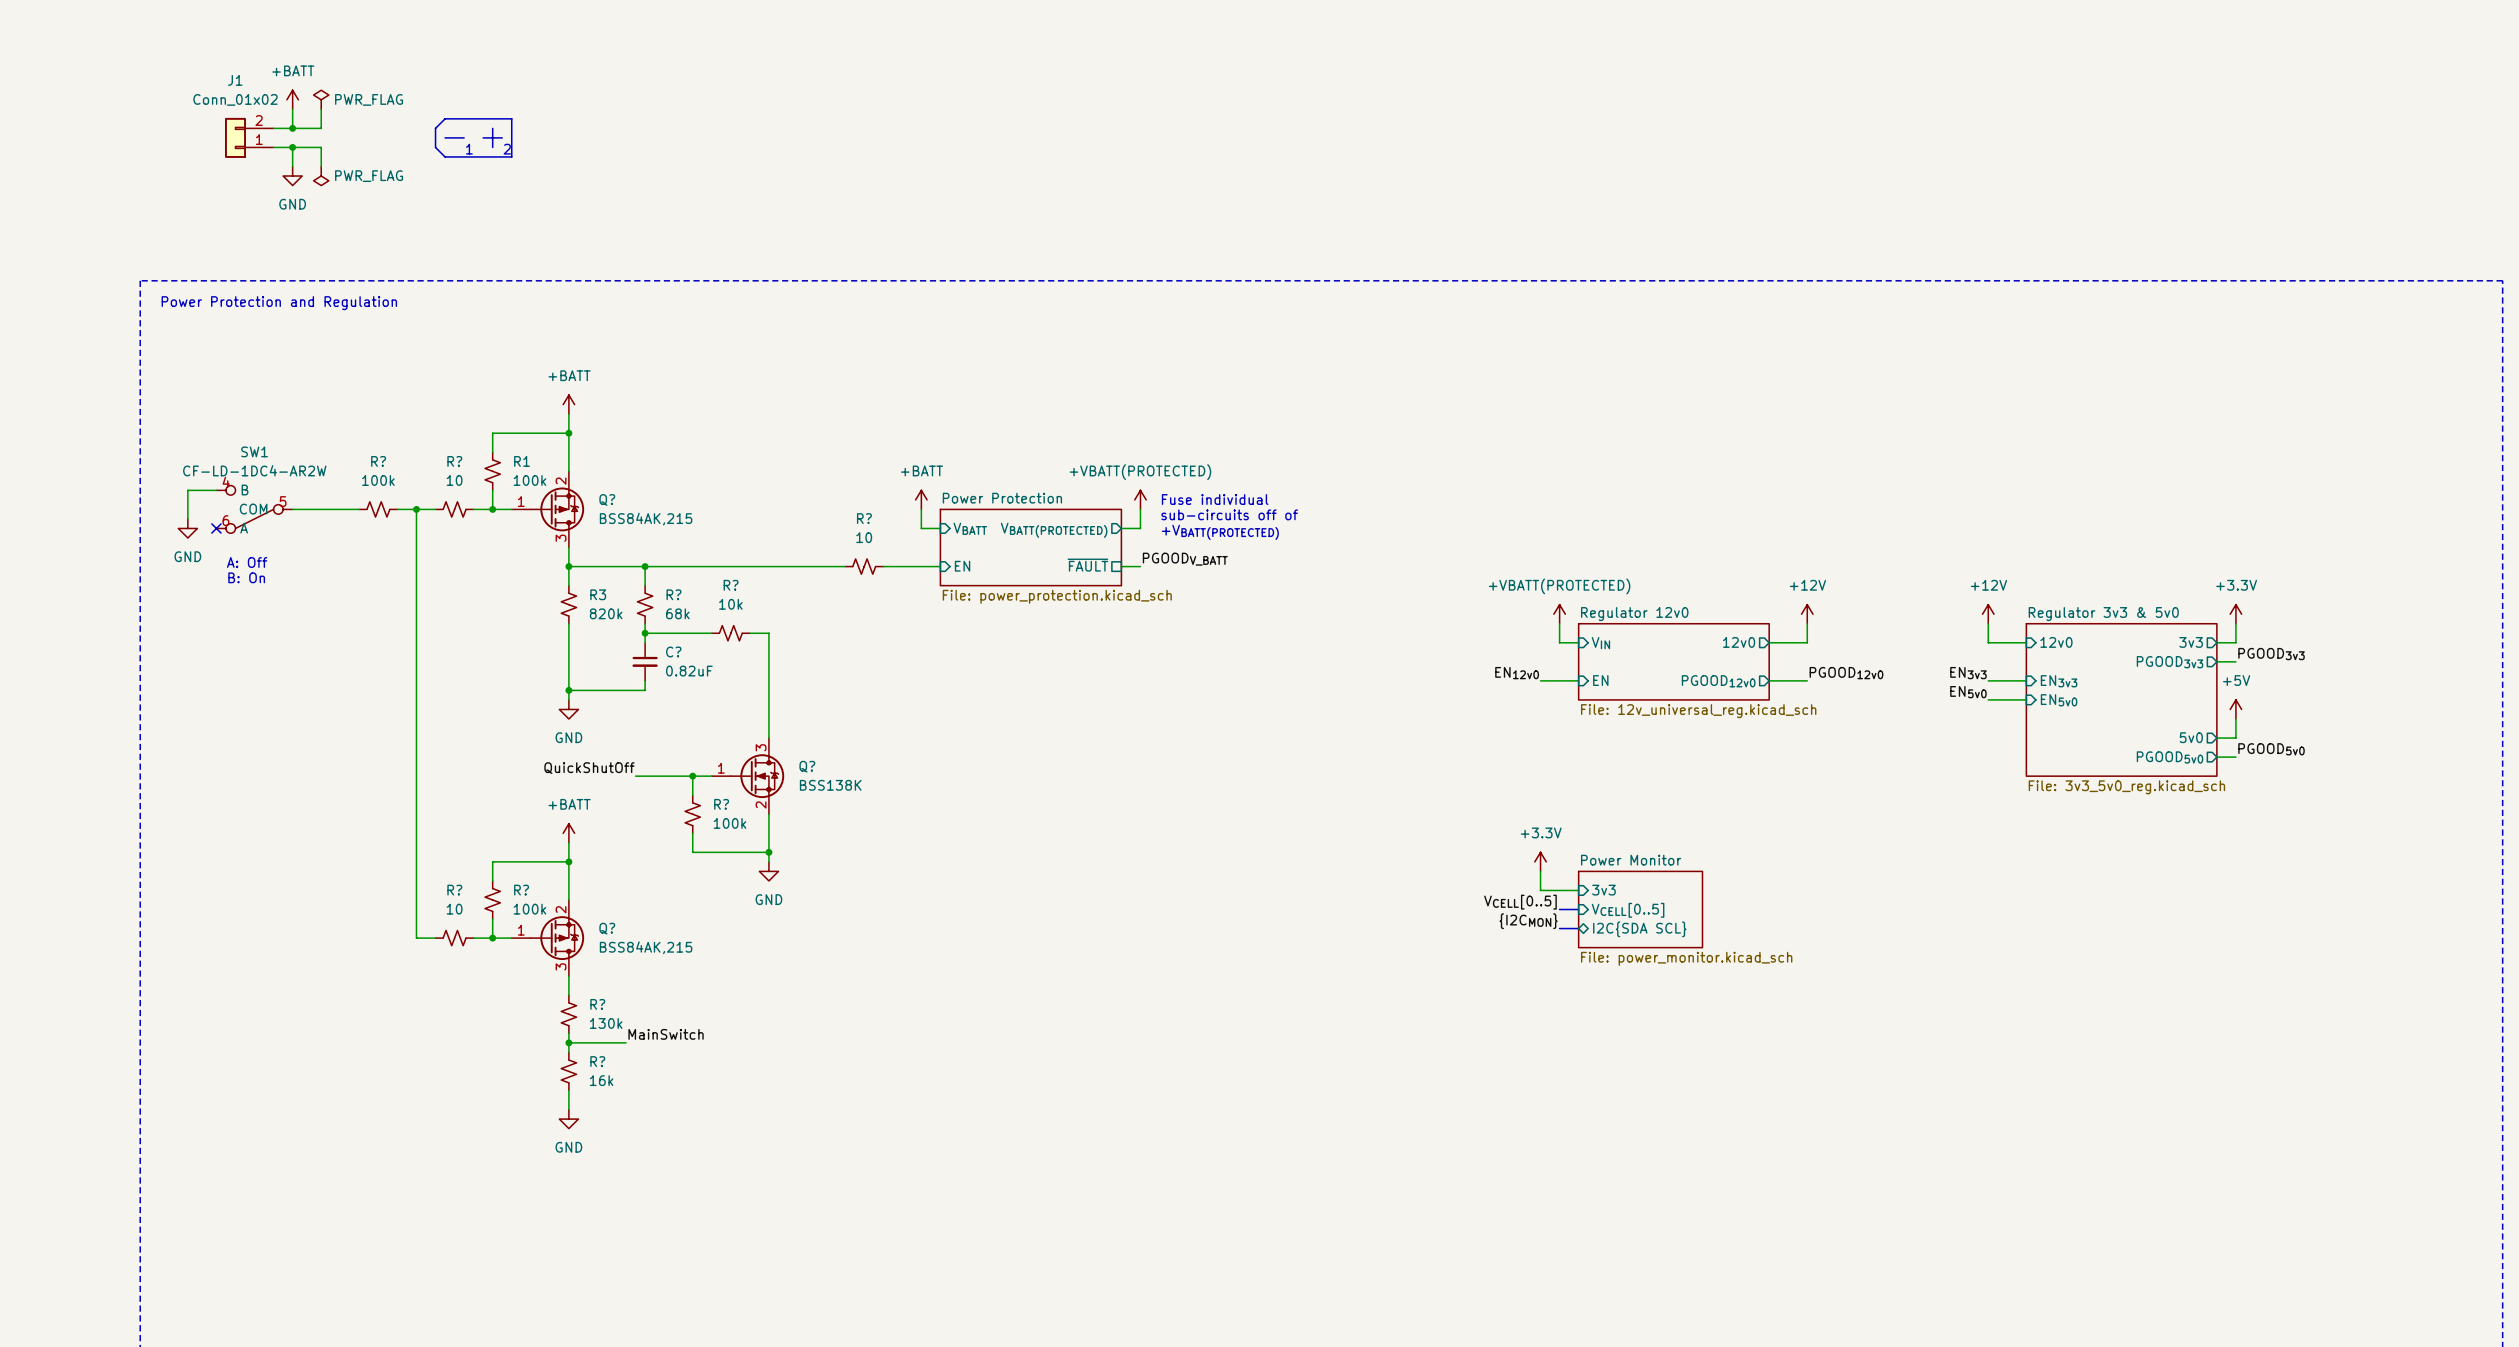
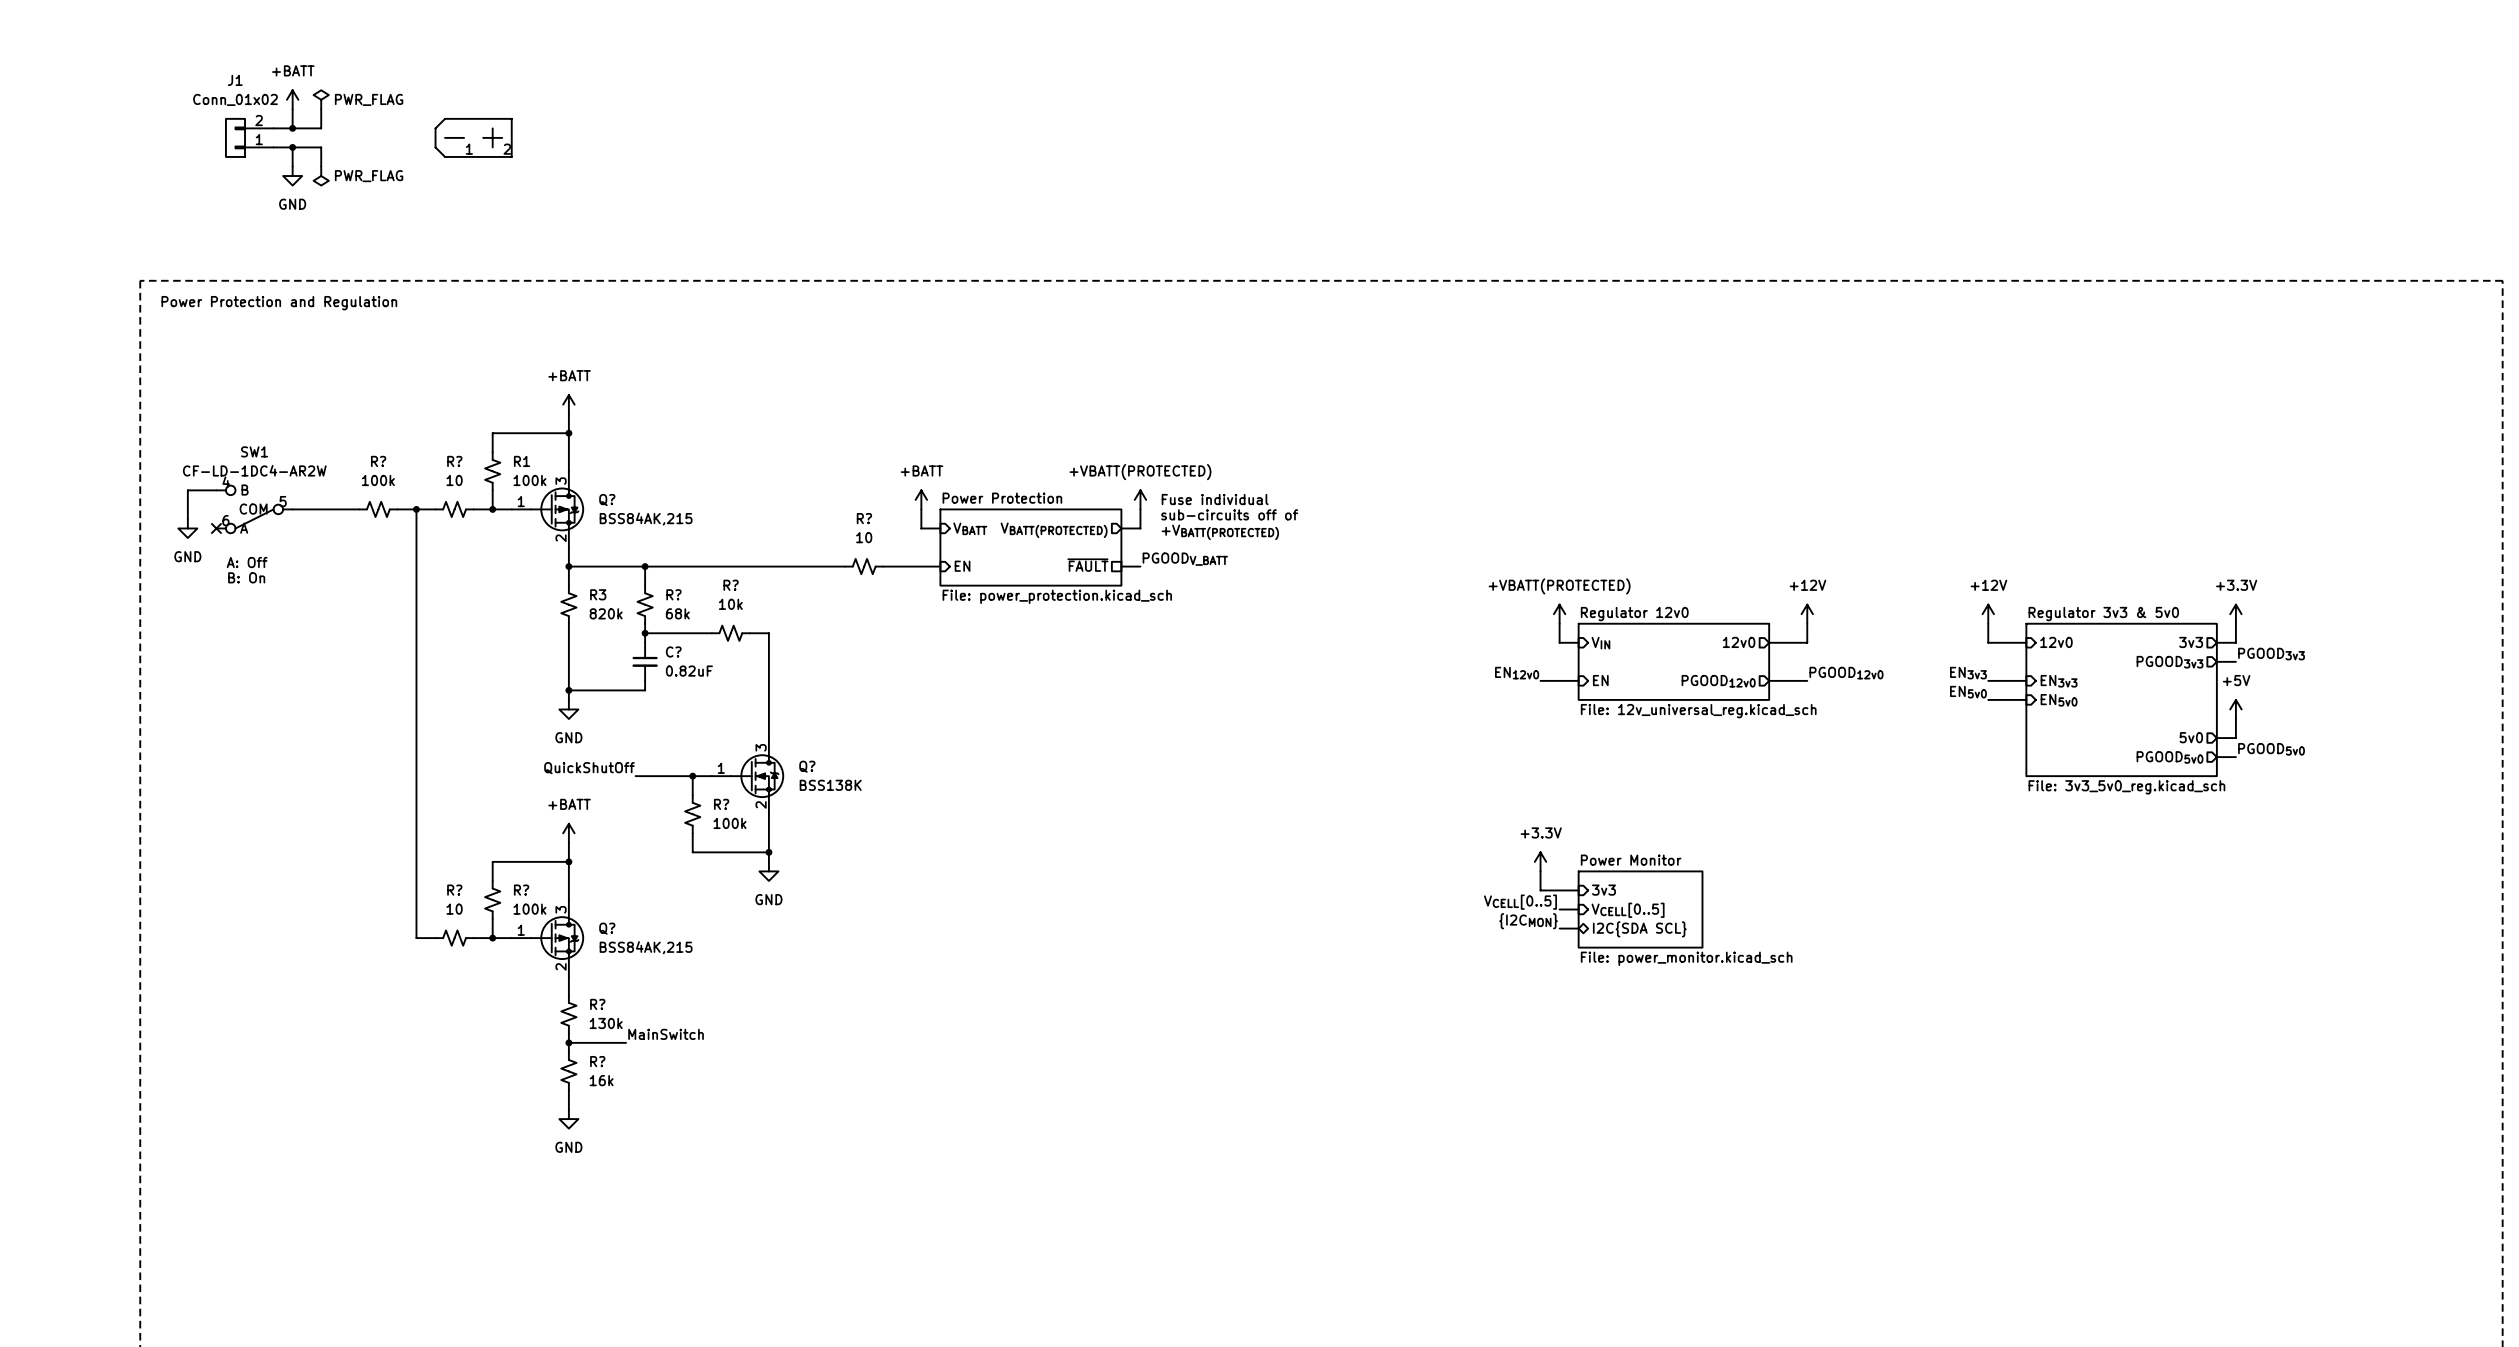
Q? flip: as is (557, 509) -> up-down (557, 509)
Q? flip: as is (557, 938) -> up-down (557, 938)

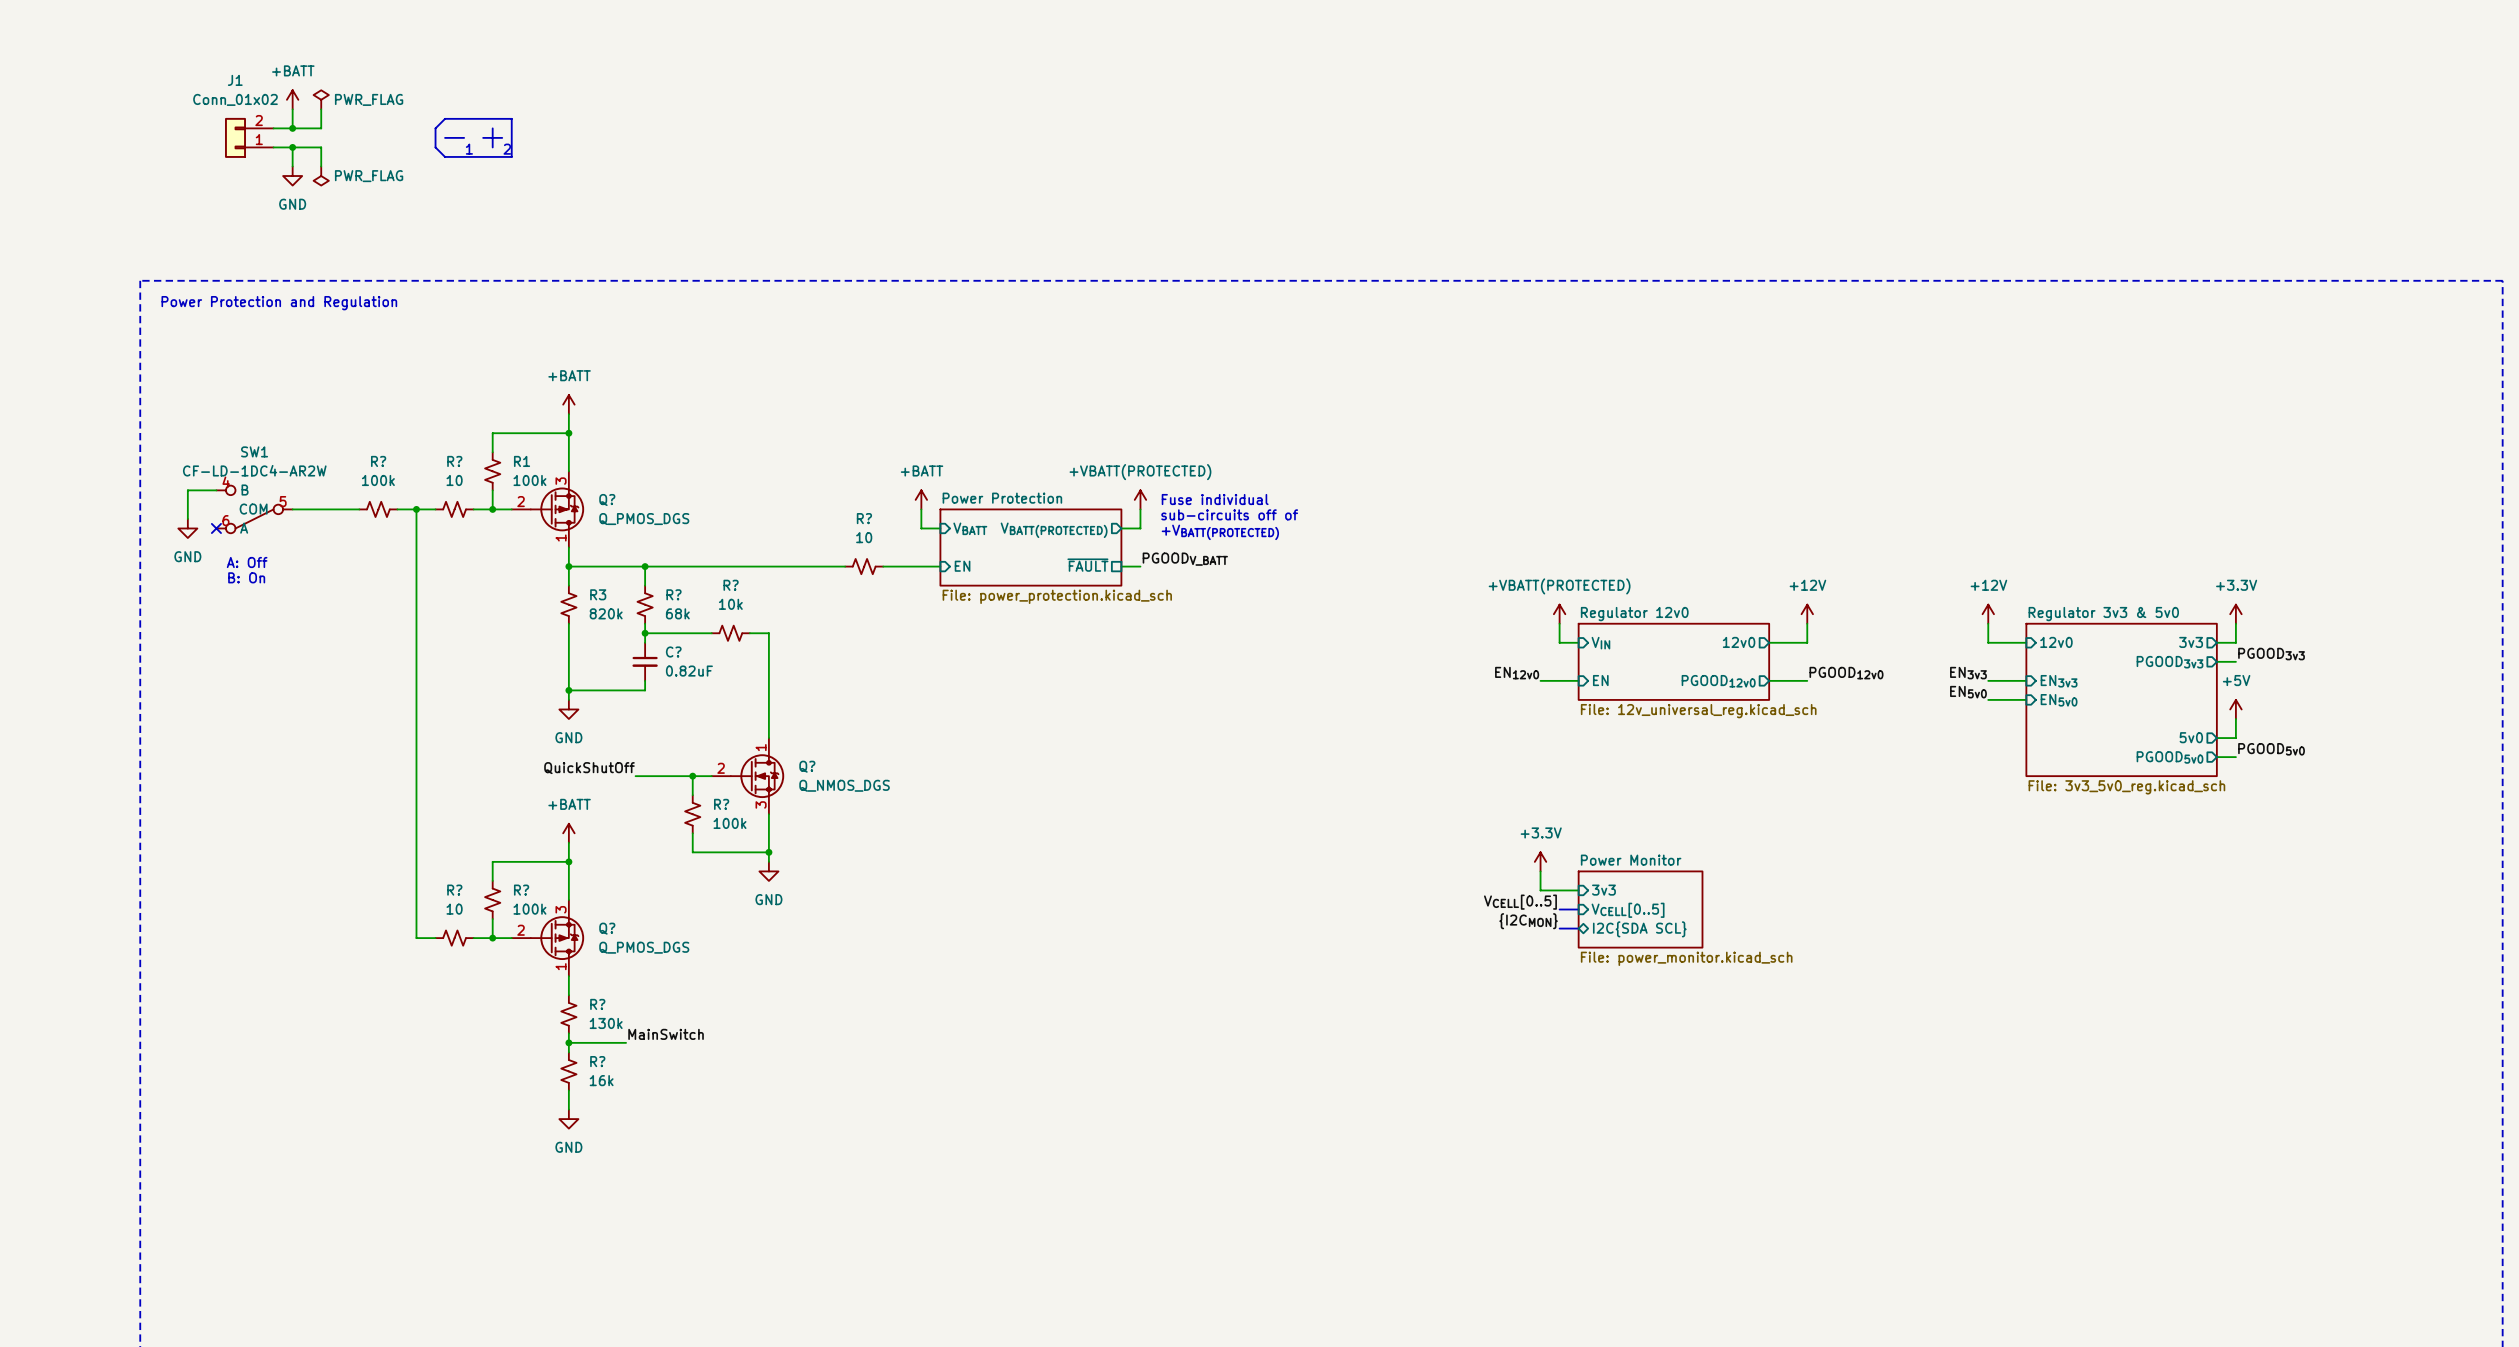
Q? symbol: [511, 471, 585, 548] -> [511, 471, 585, 548]
Q? value: BSS84AK,215 (646, 519) -> Q_PMOS_DGS (644, 519)
Q? pin number: 3 (761, 747) -> 1 (761, 747)
Q? pin number: 1 (721, 768) -> 2 (721, 768)
Q? value: BSS138K (830, 785) -> Q_NMOS_DGS (844, 785)
Q? pin number: 2 (761, 804) -> 3 (761, 804)
Q? symbol: [511, 899, 585, 977] -> [511, 899, 585, 977]
Q? value: BSS84AK,215 (646, 947) -> Q_PMOS_DGS (644, 947)

